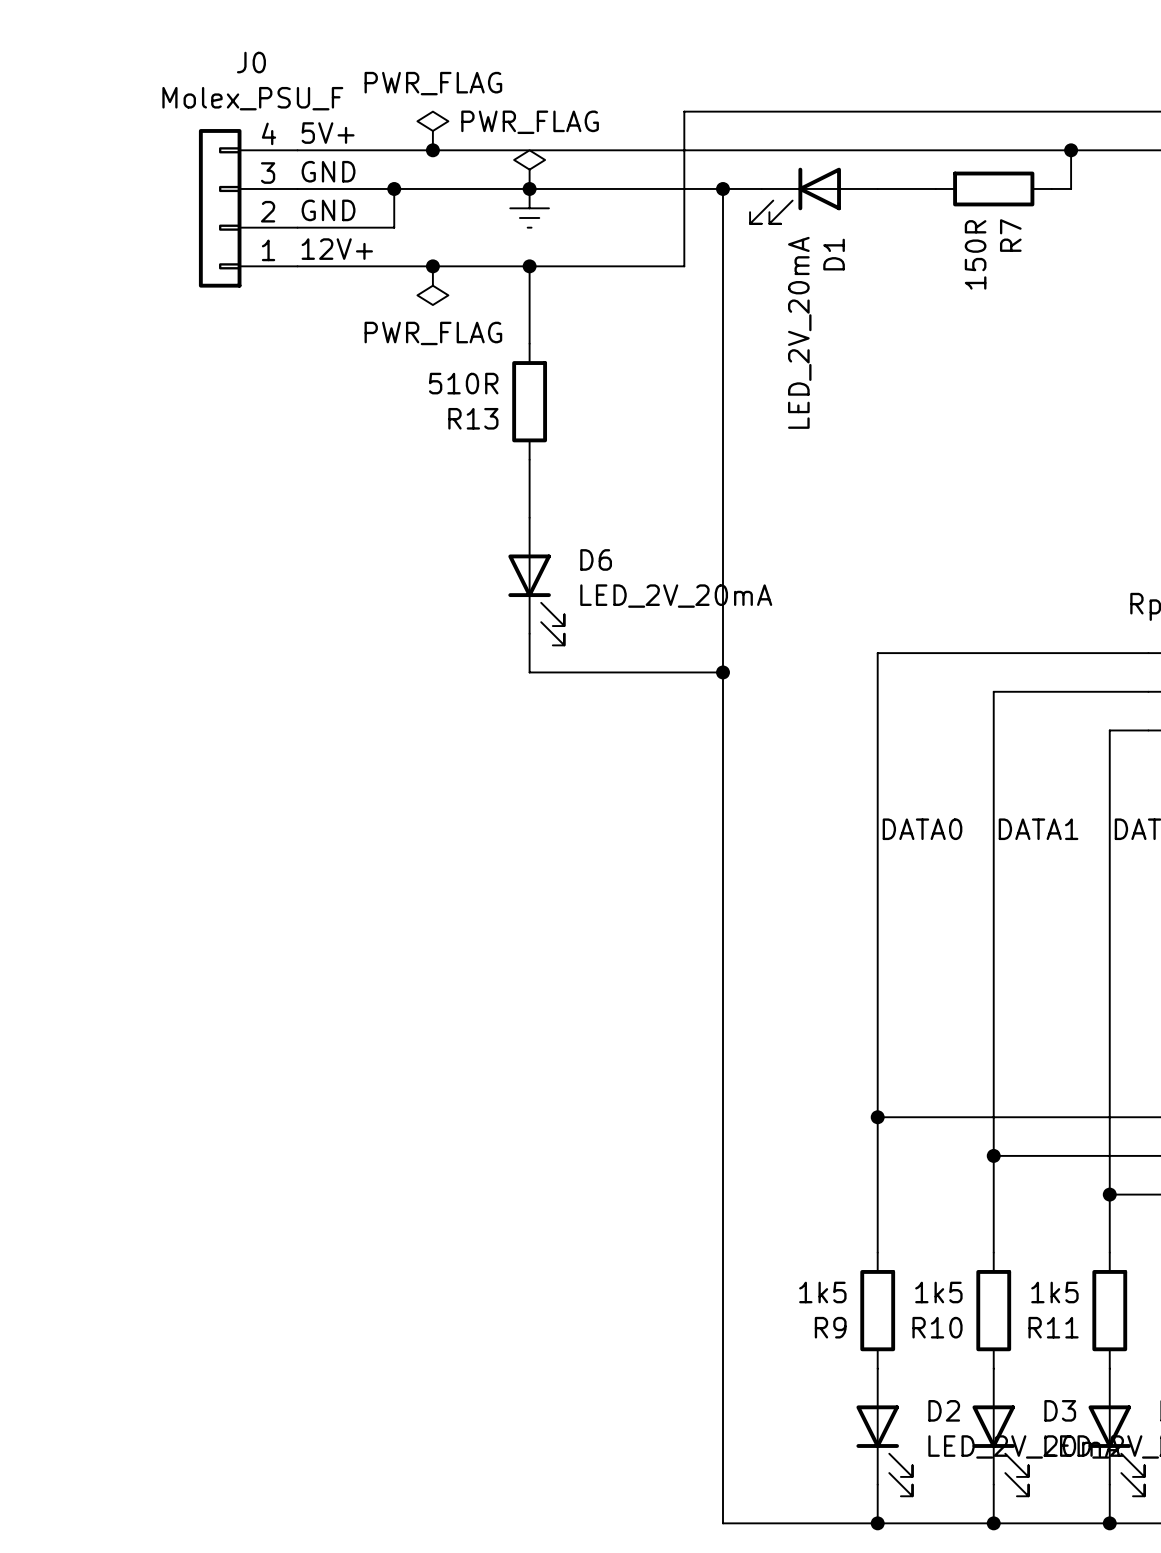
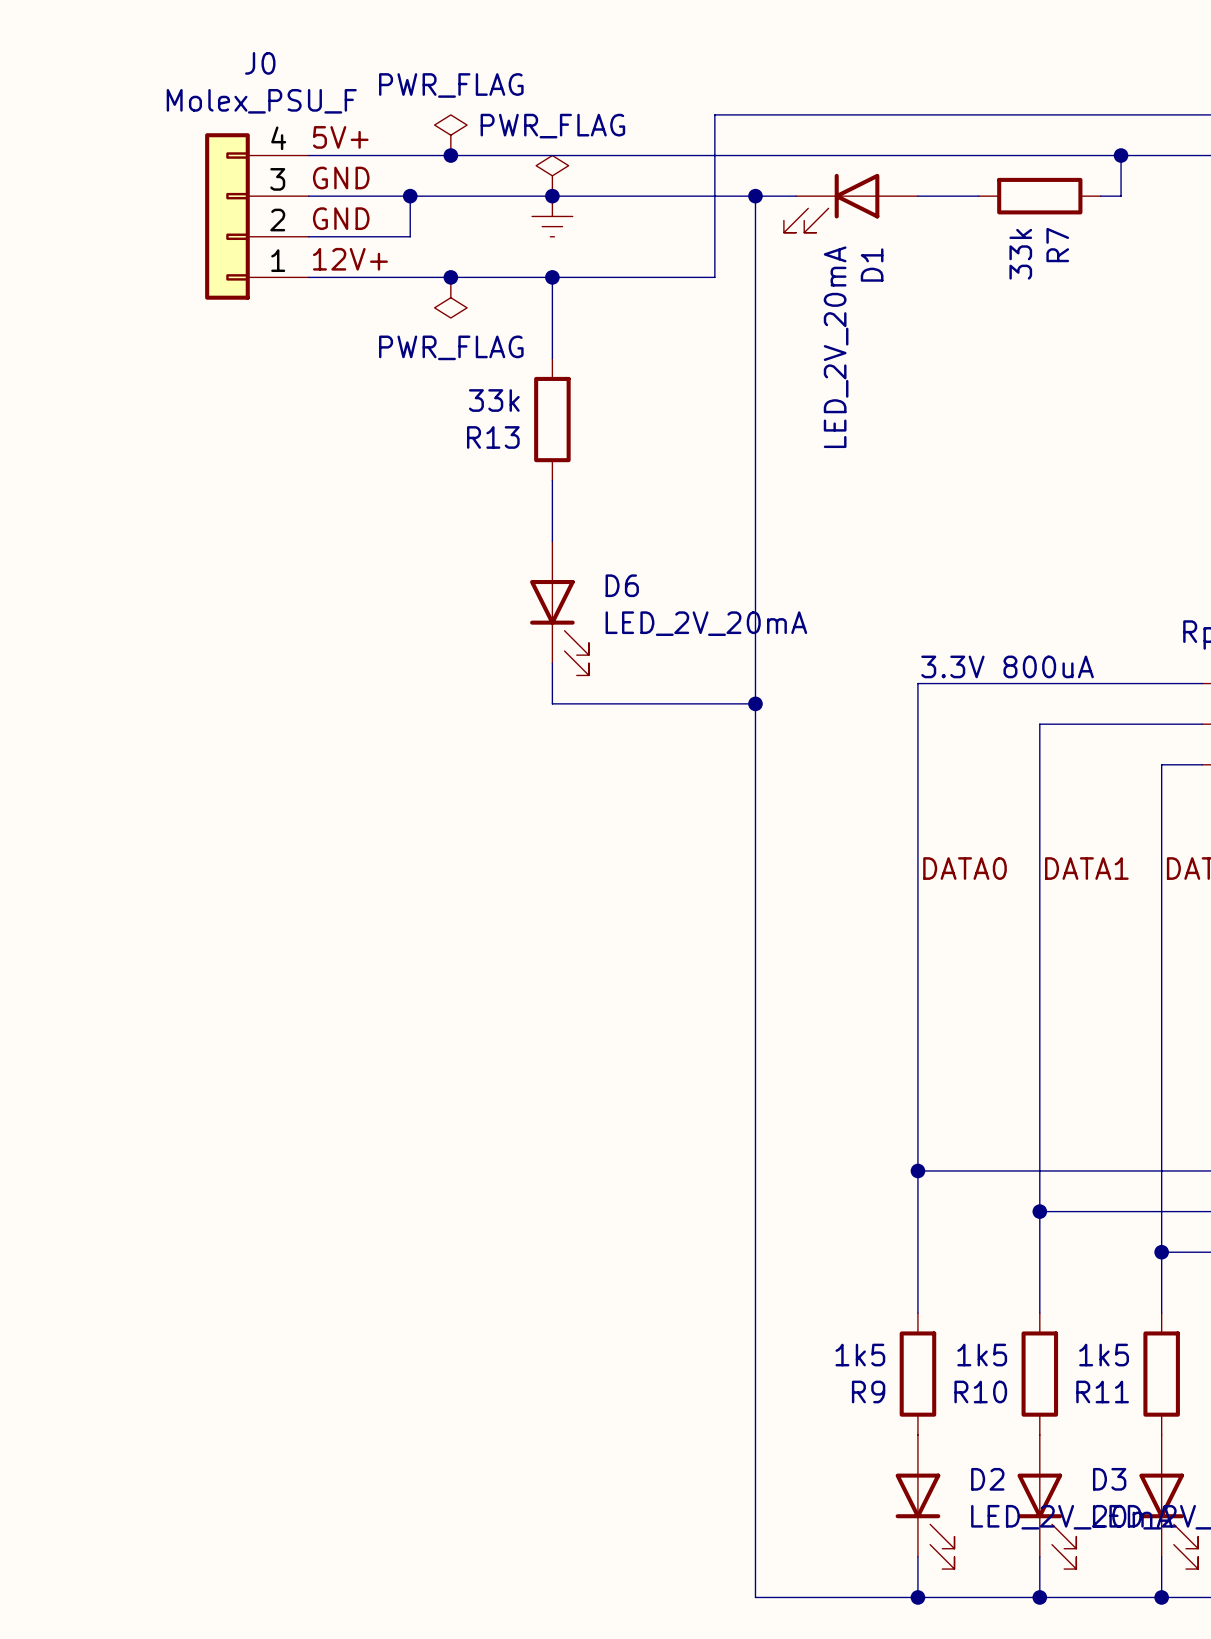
R7 value: 150R (975, 254) -> 33k (1020, 254)
R13 value: 510R (463, 383) -> 33k (494, 400)
text: none -> 3.3V 800uA (1007, 666)

